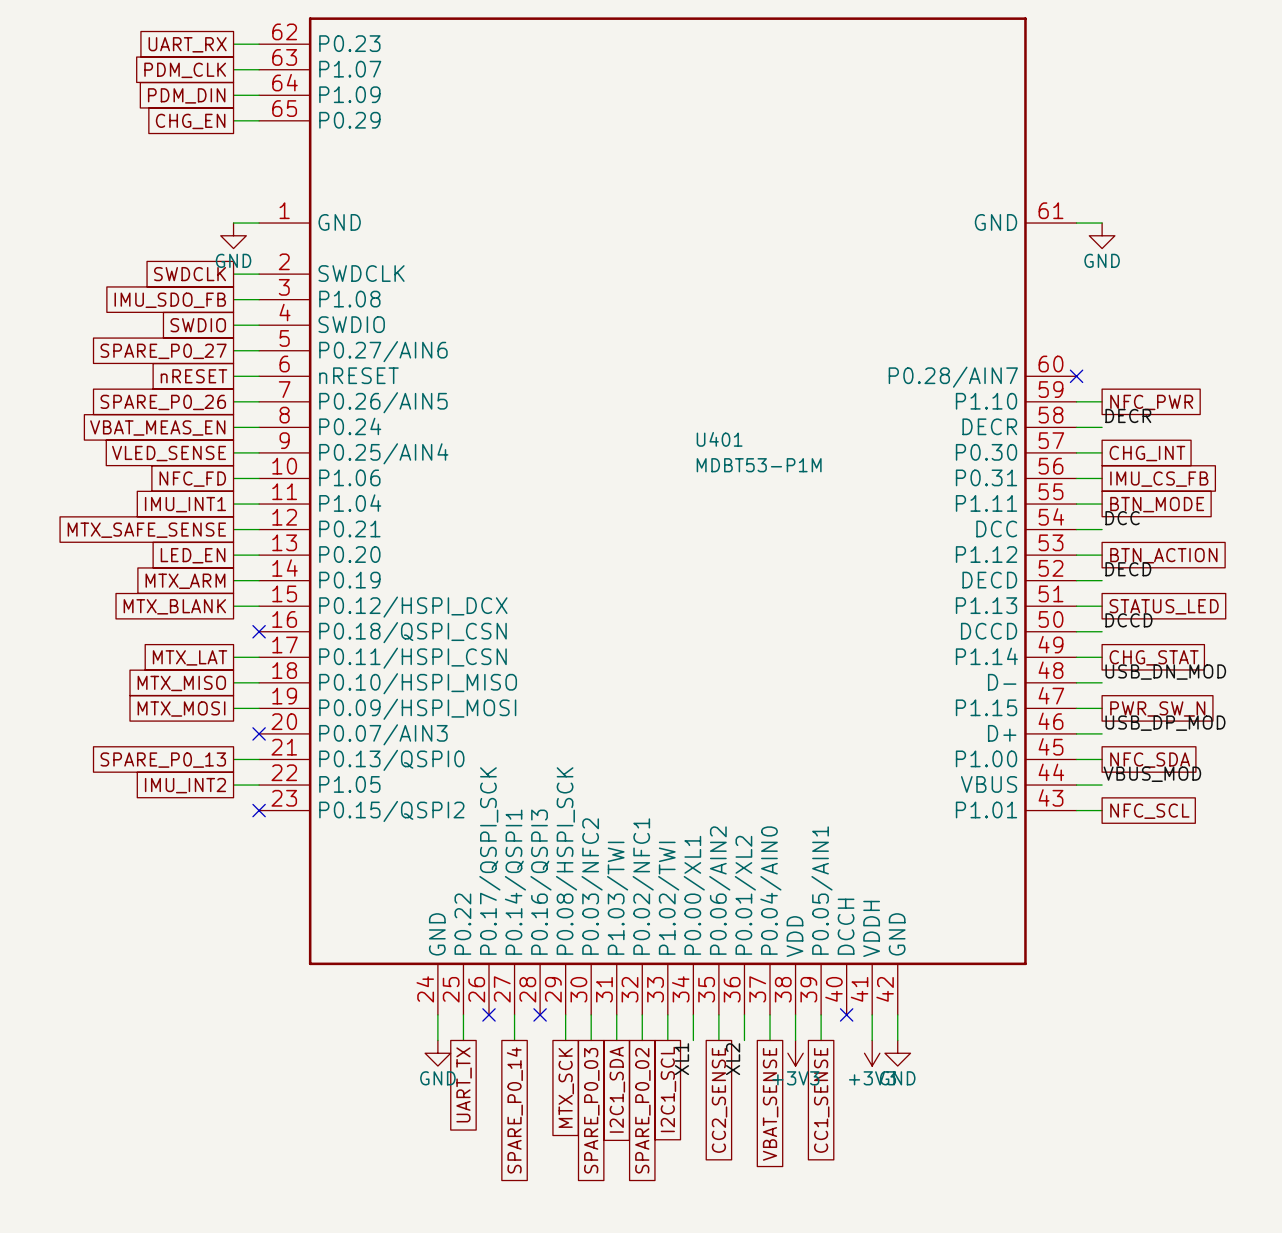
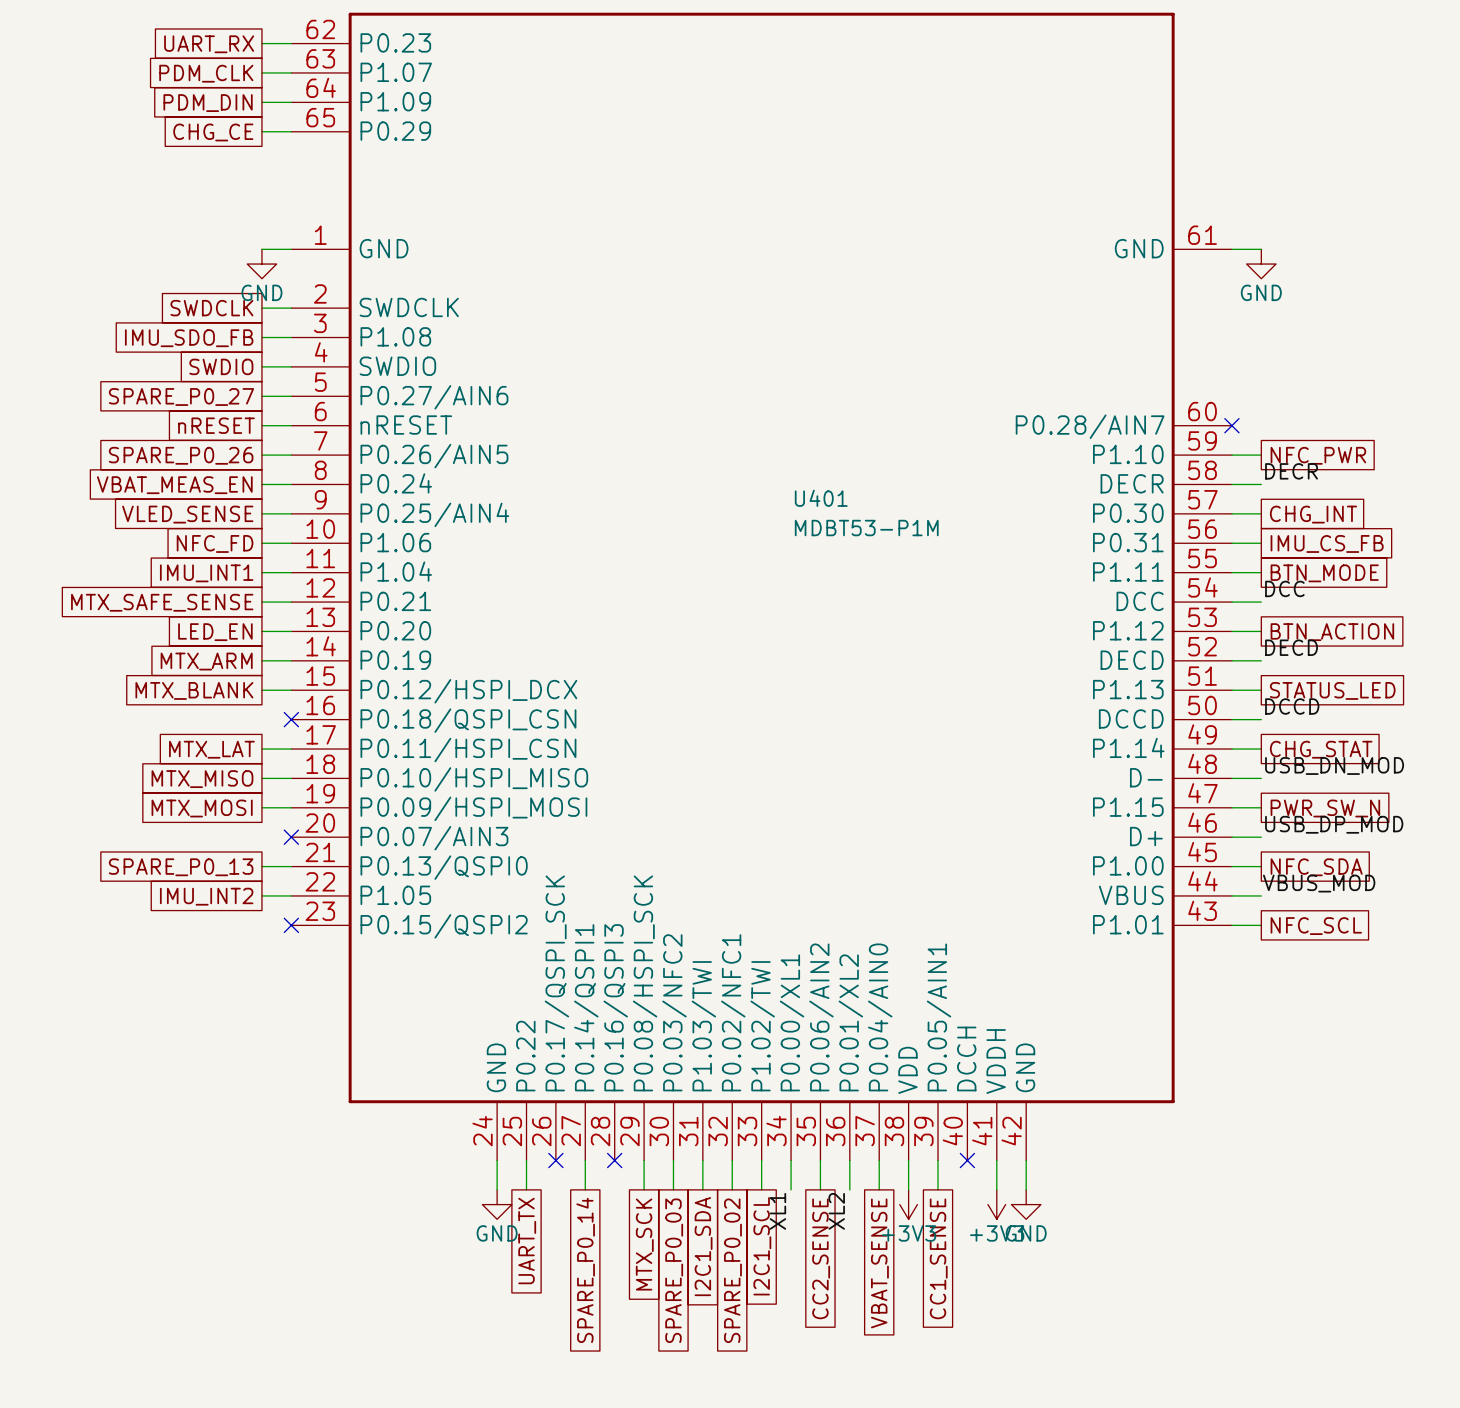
global label: CHG_EN (190, 121) -> CHG_CE (213, 132)

